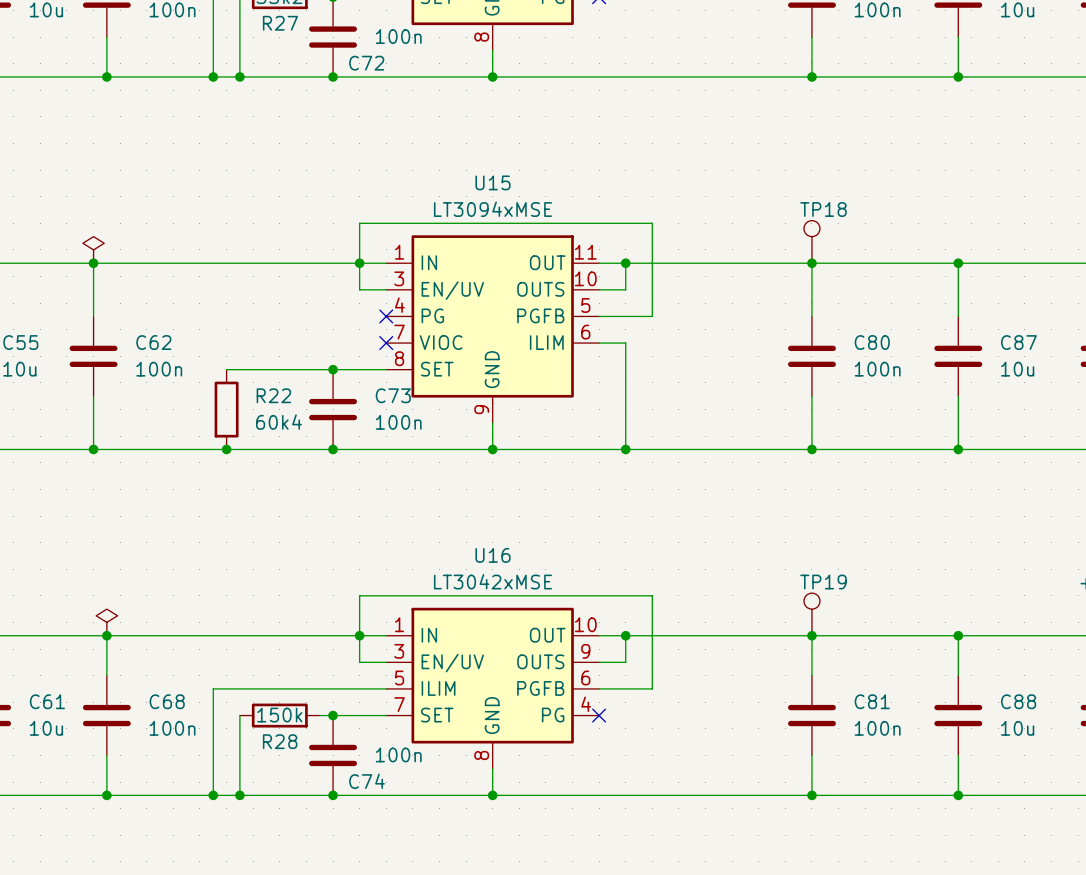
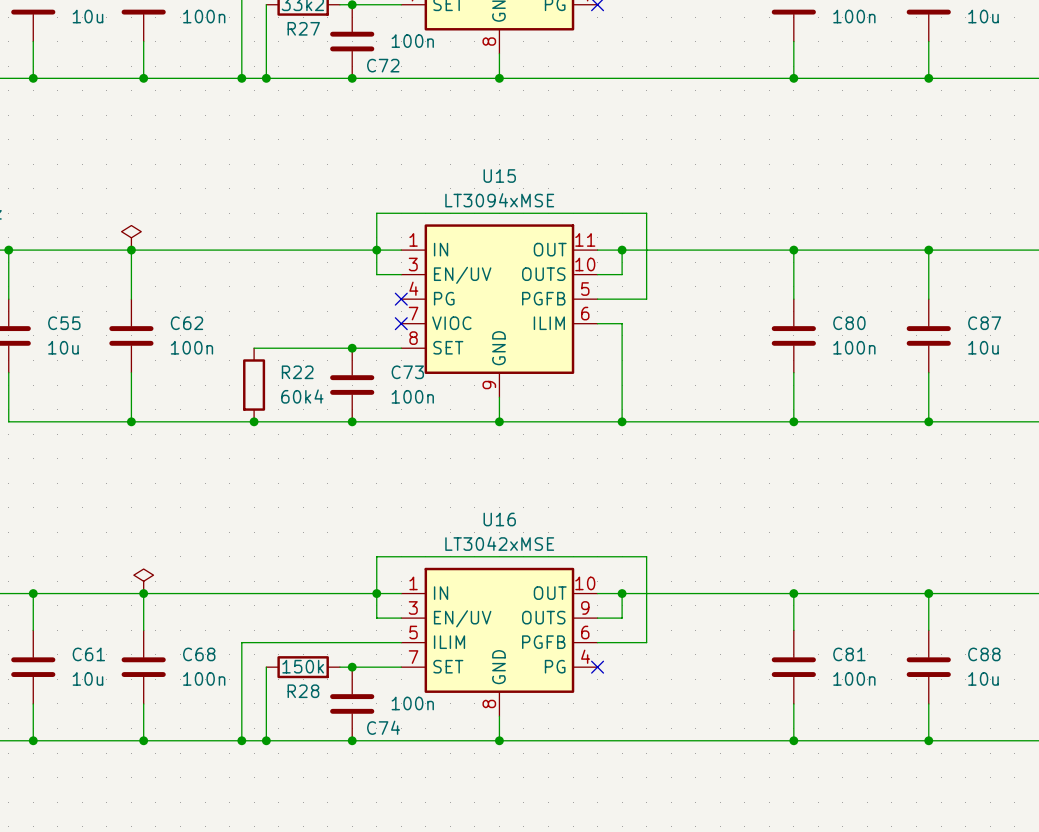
TP18: (811, 241) -> none
TP19: (811, 614) -> none

